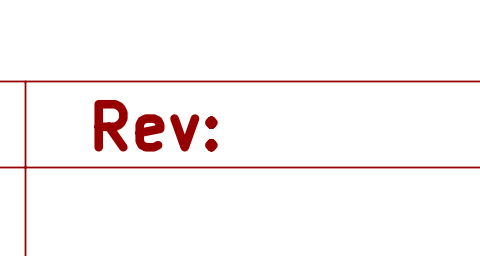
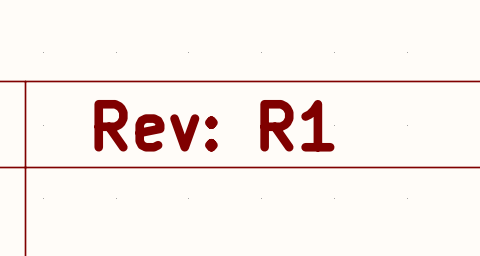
title block: Rev: (156, 125) -> Rev: R1 (214, 125)

